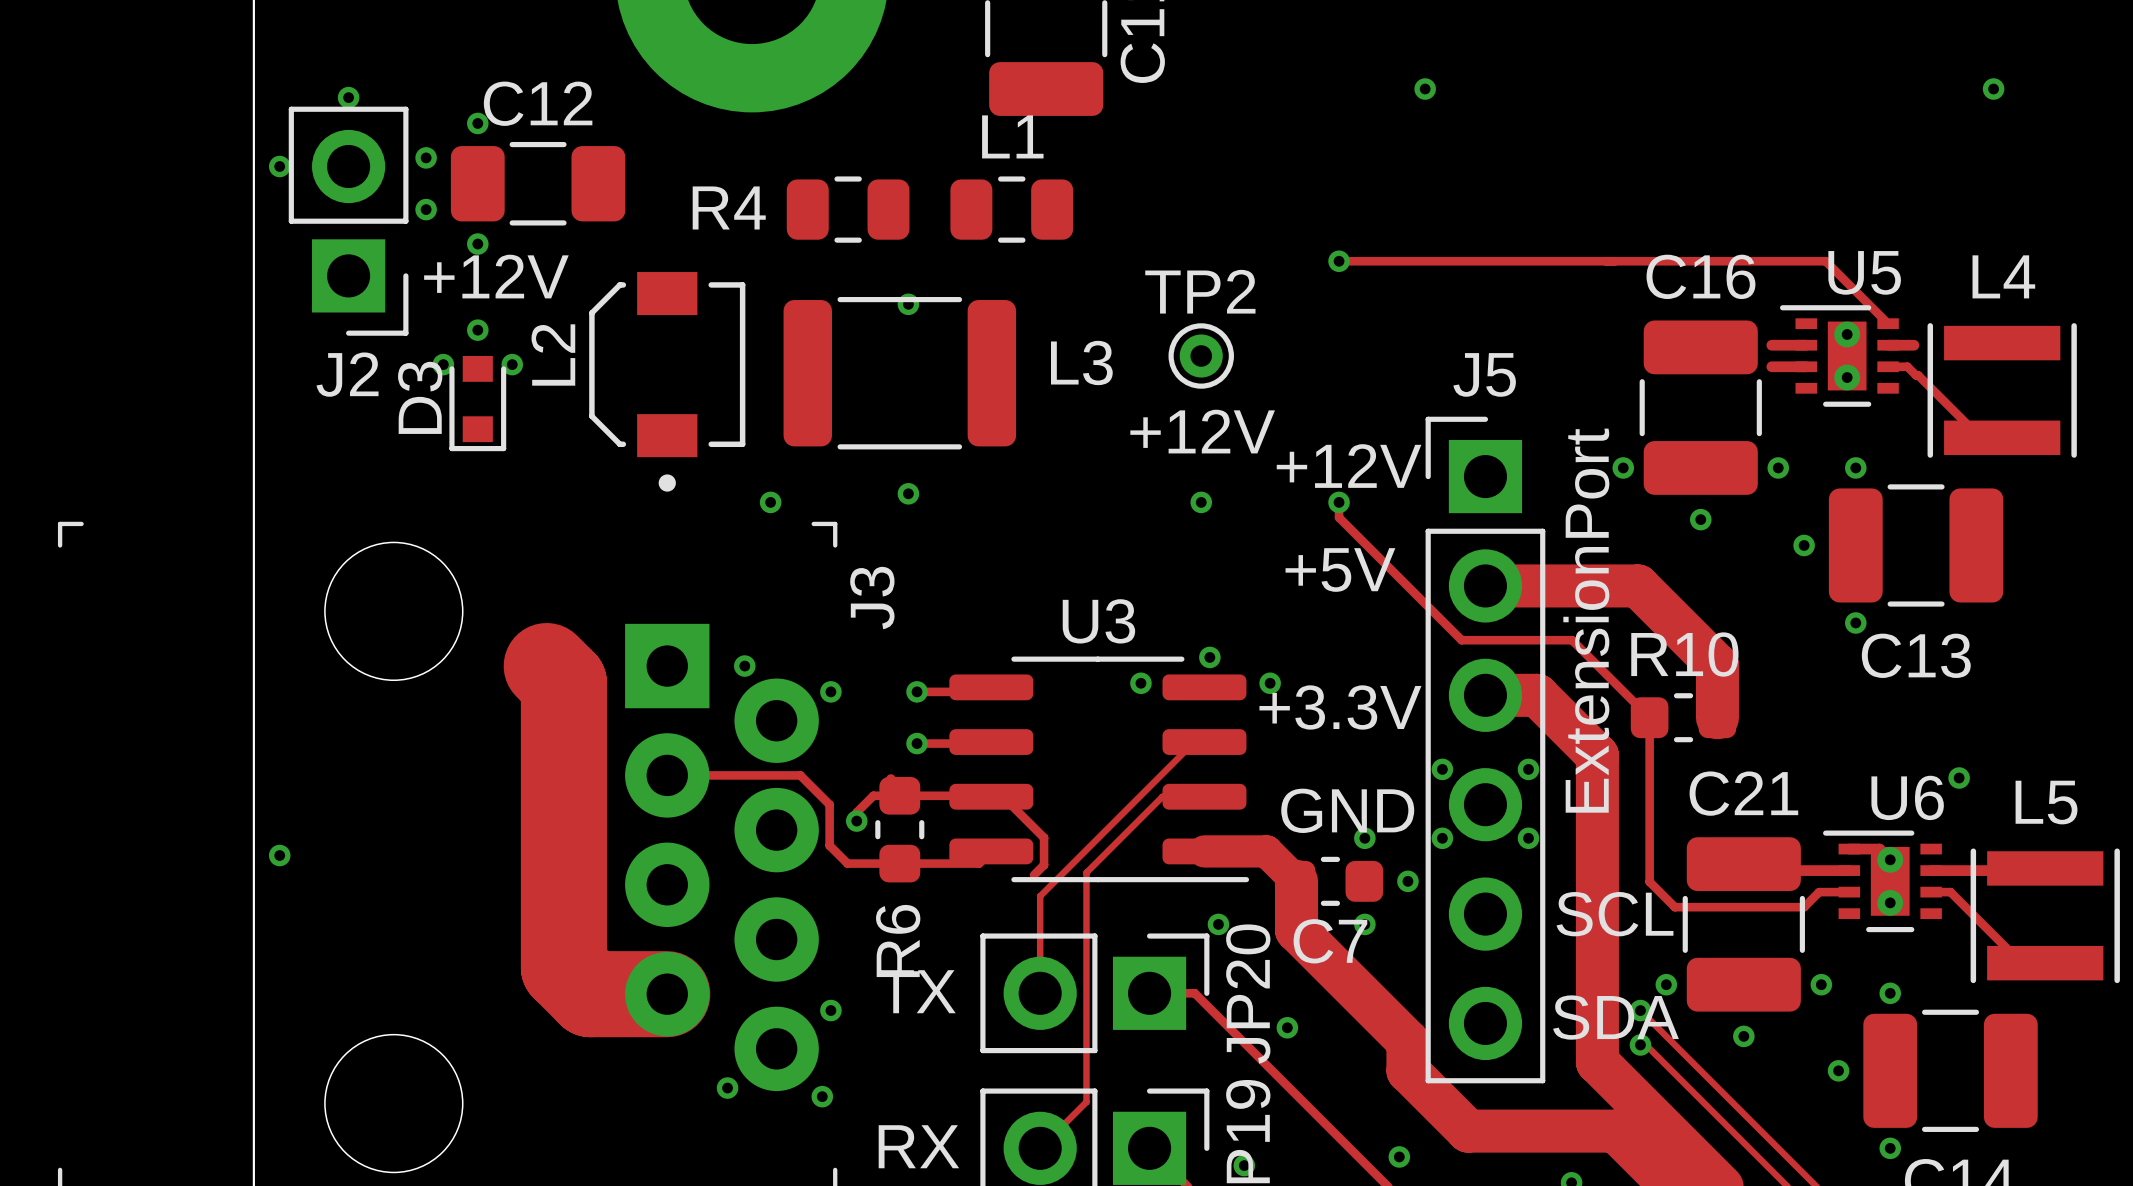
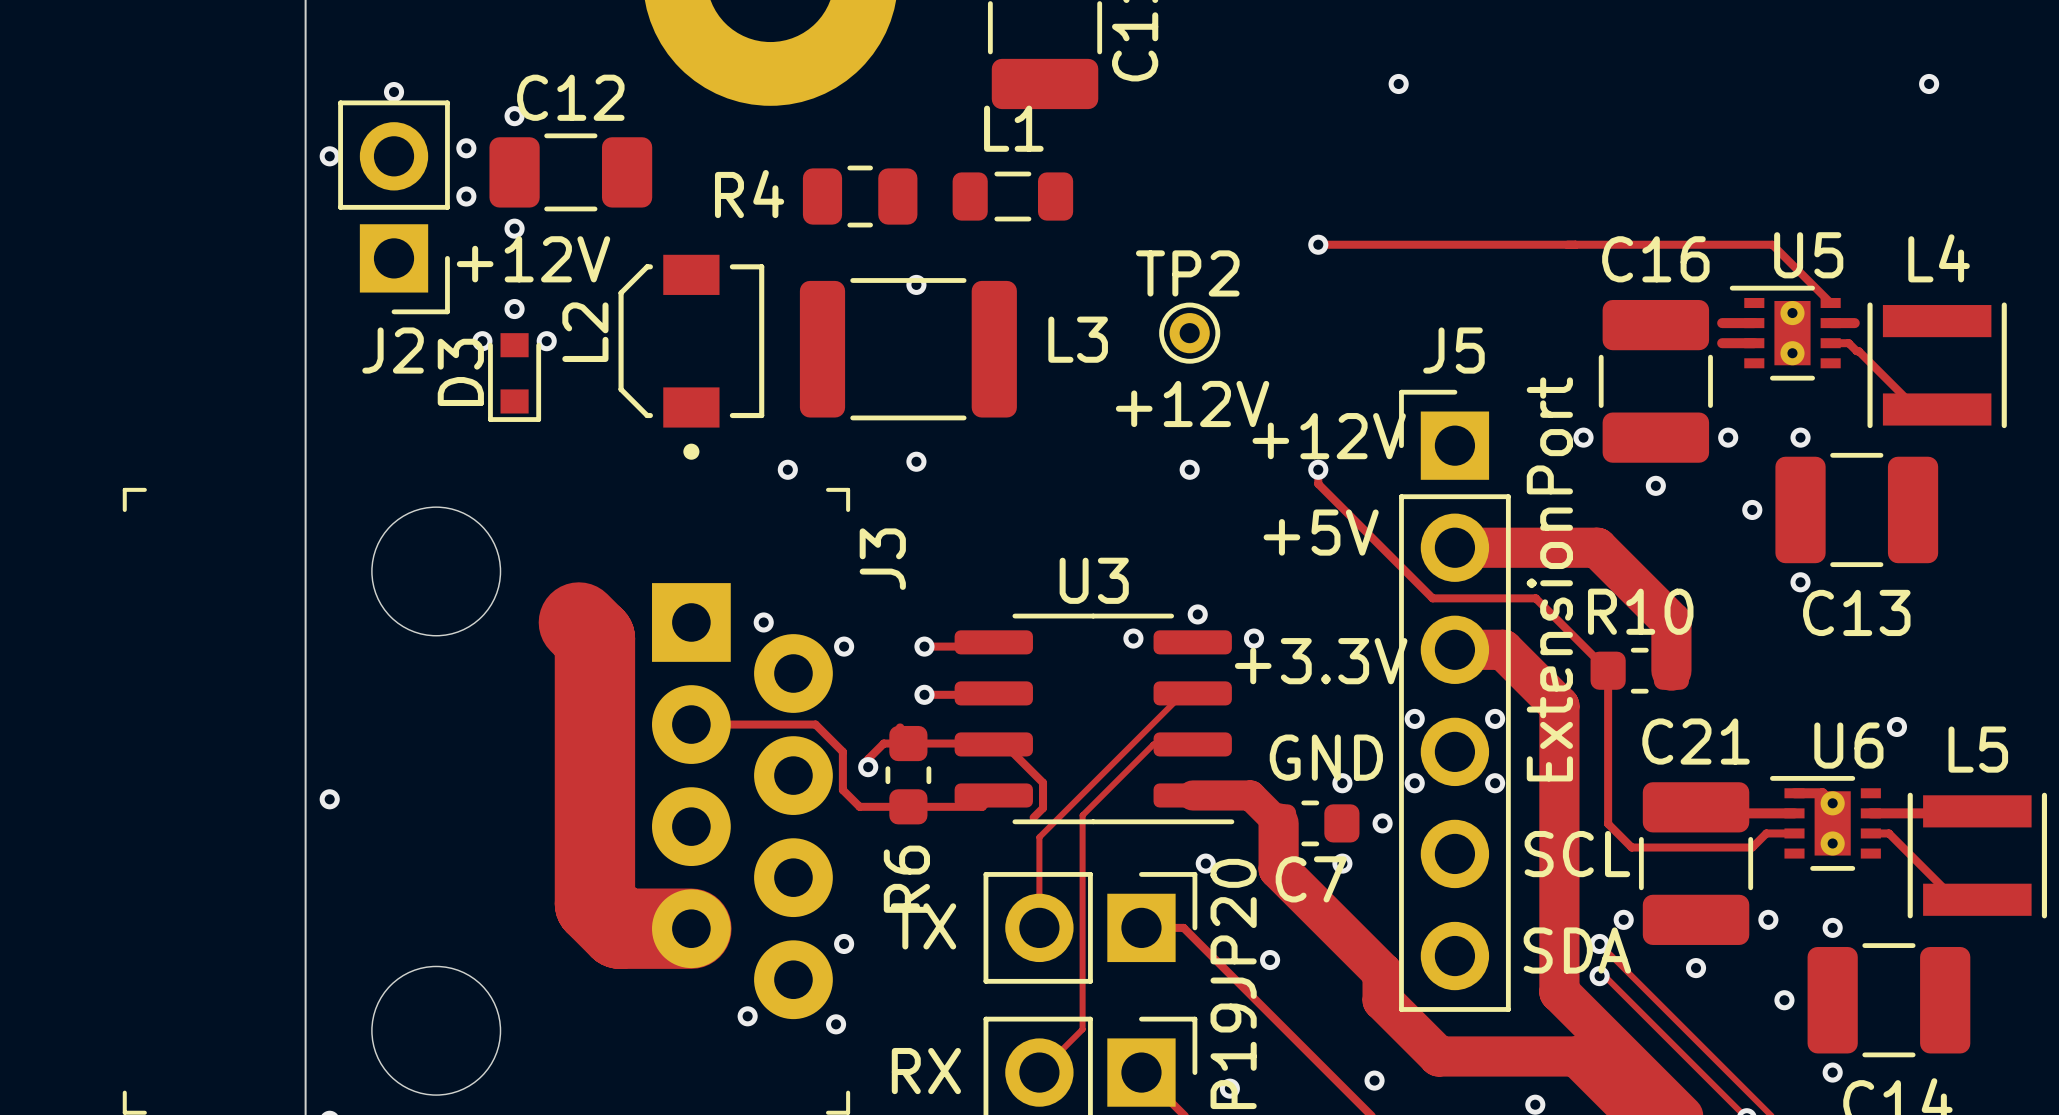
L1 footprint: [950, 176, 1074, 243] -> [952, 171, 1074, 222]

